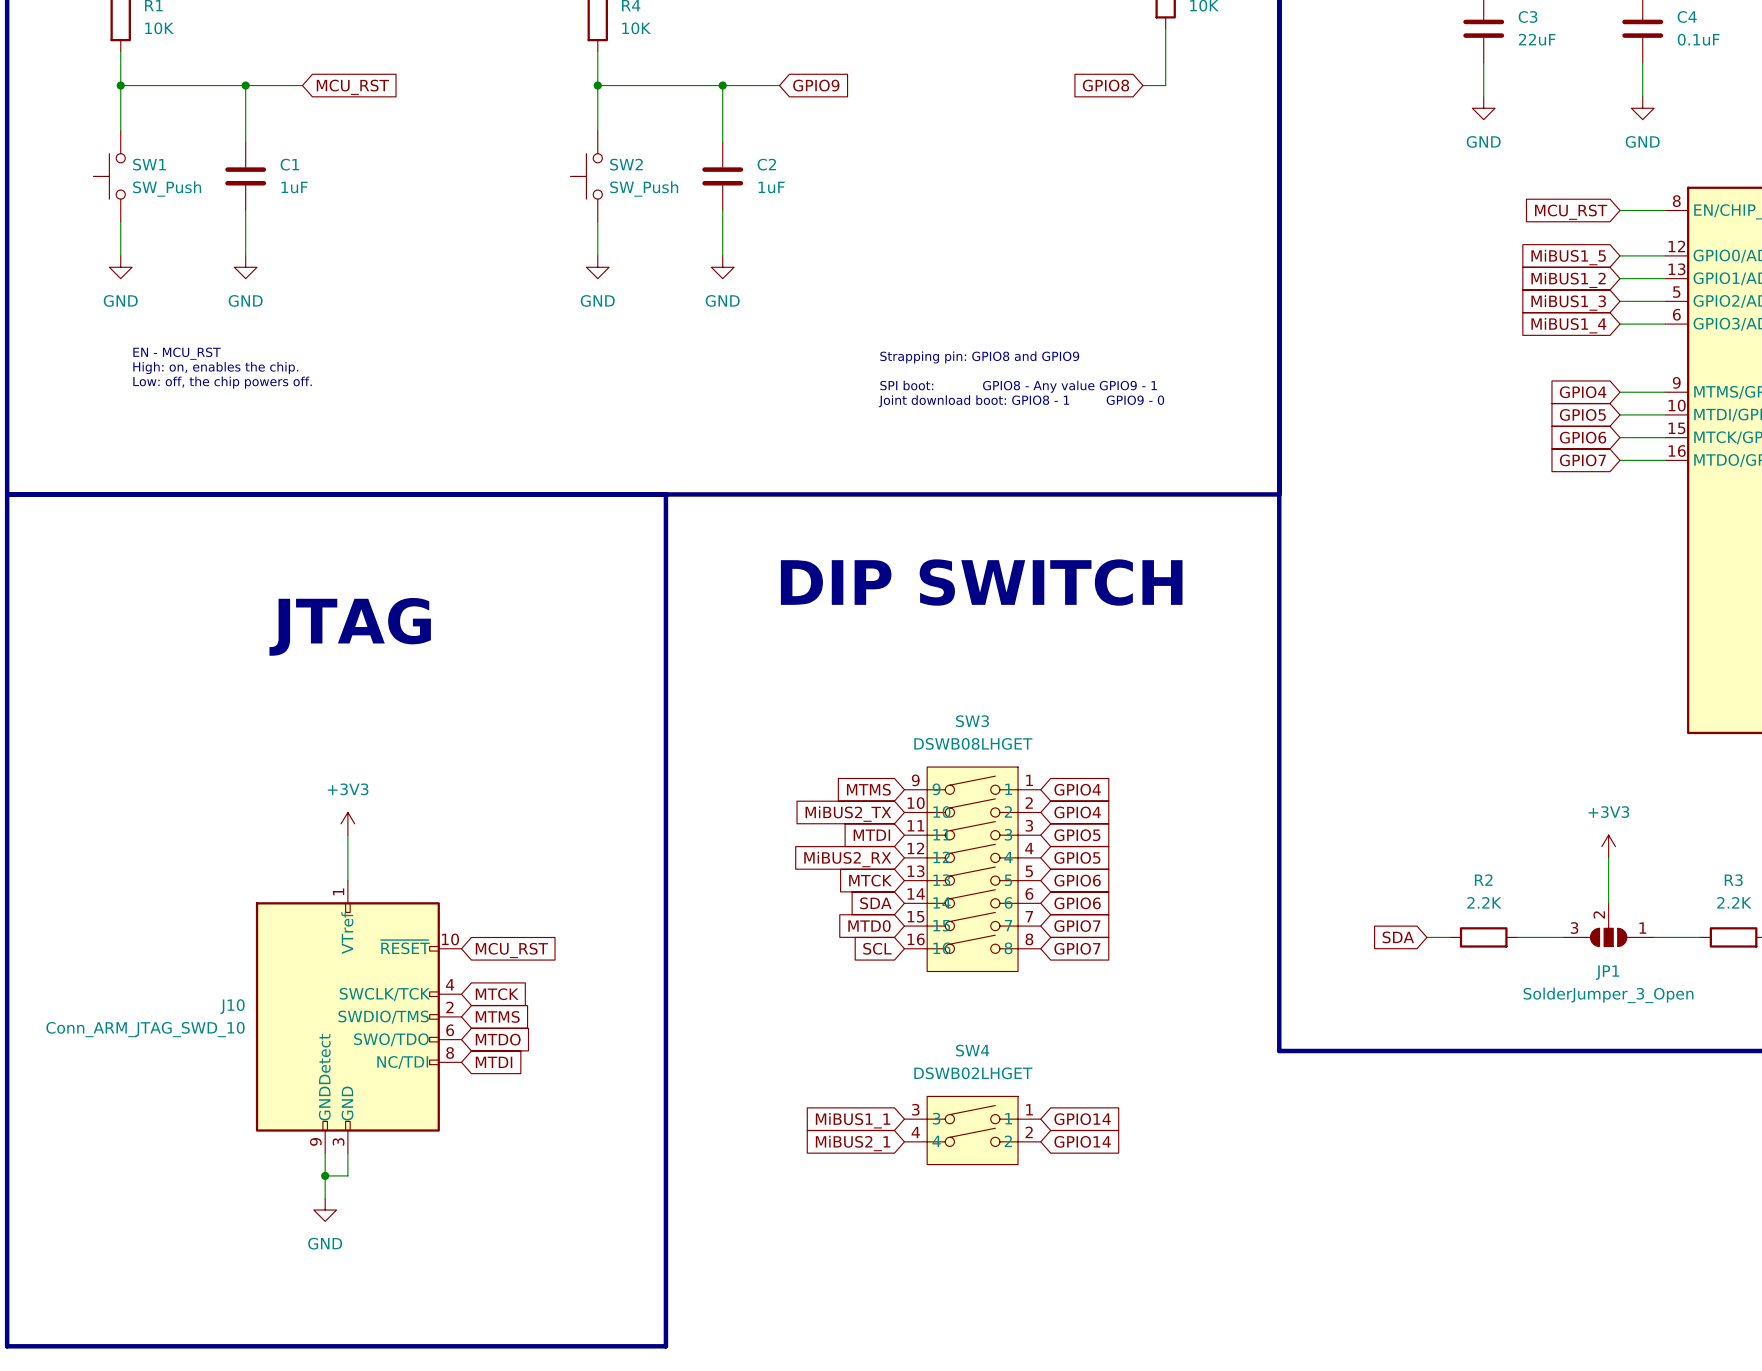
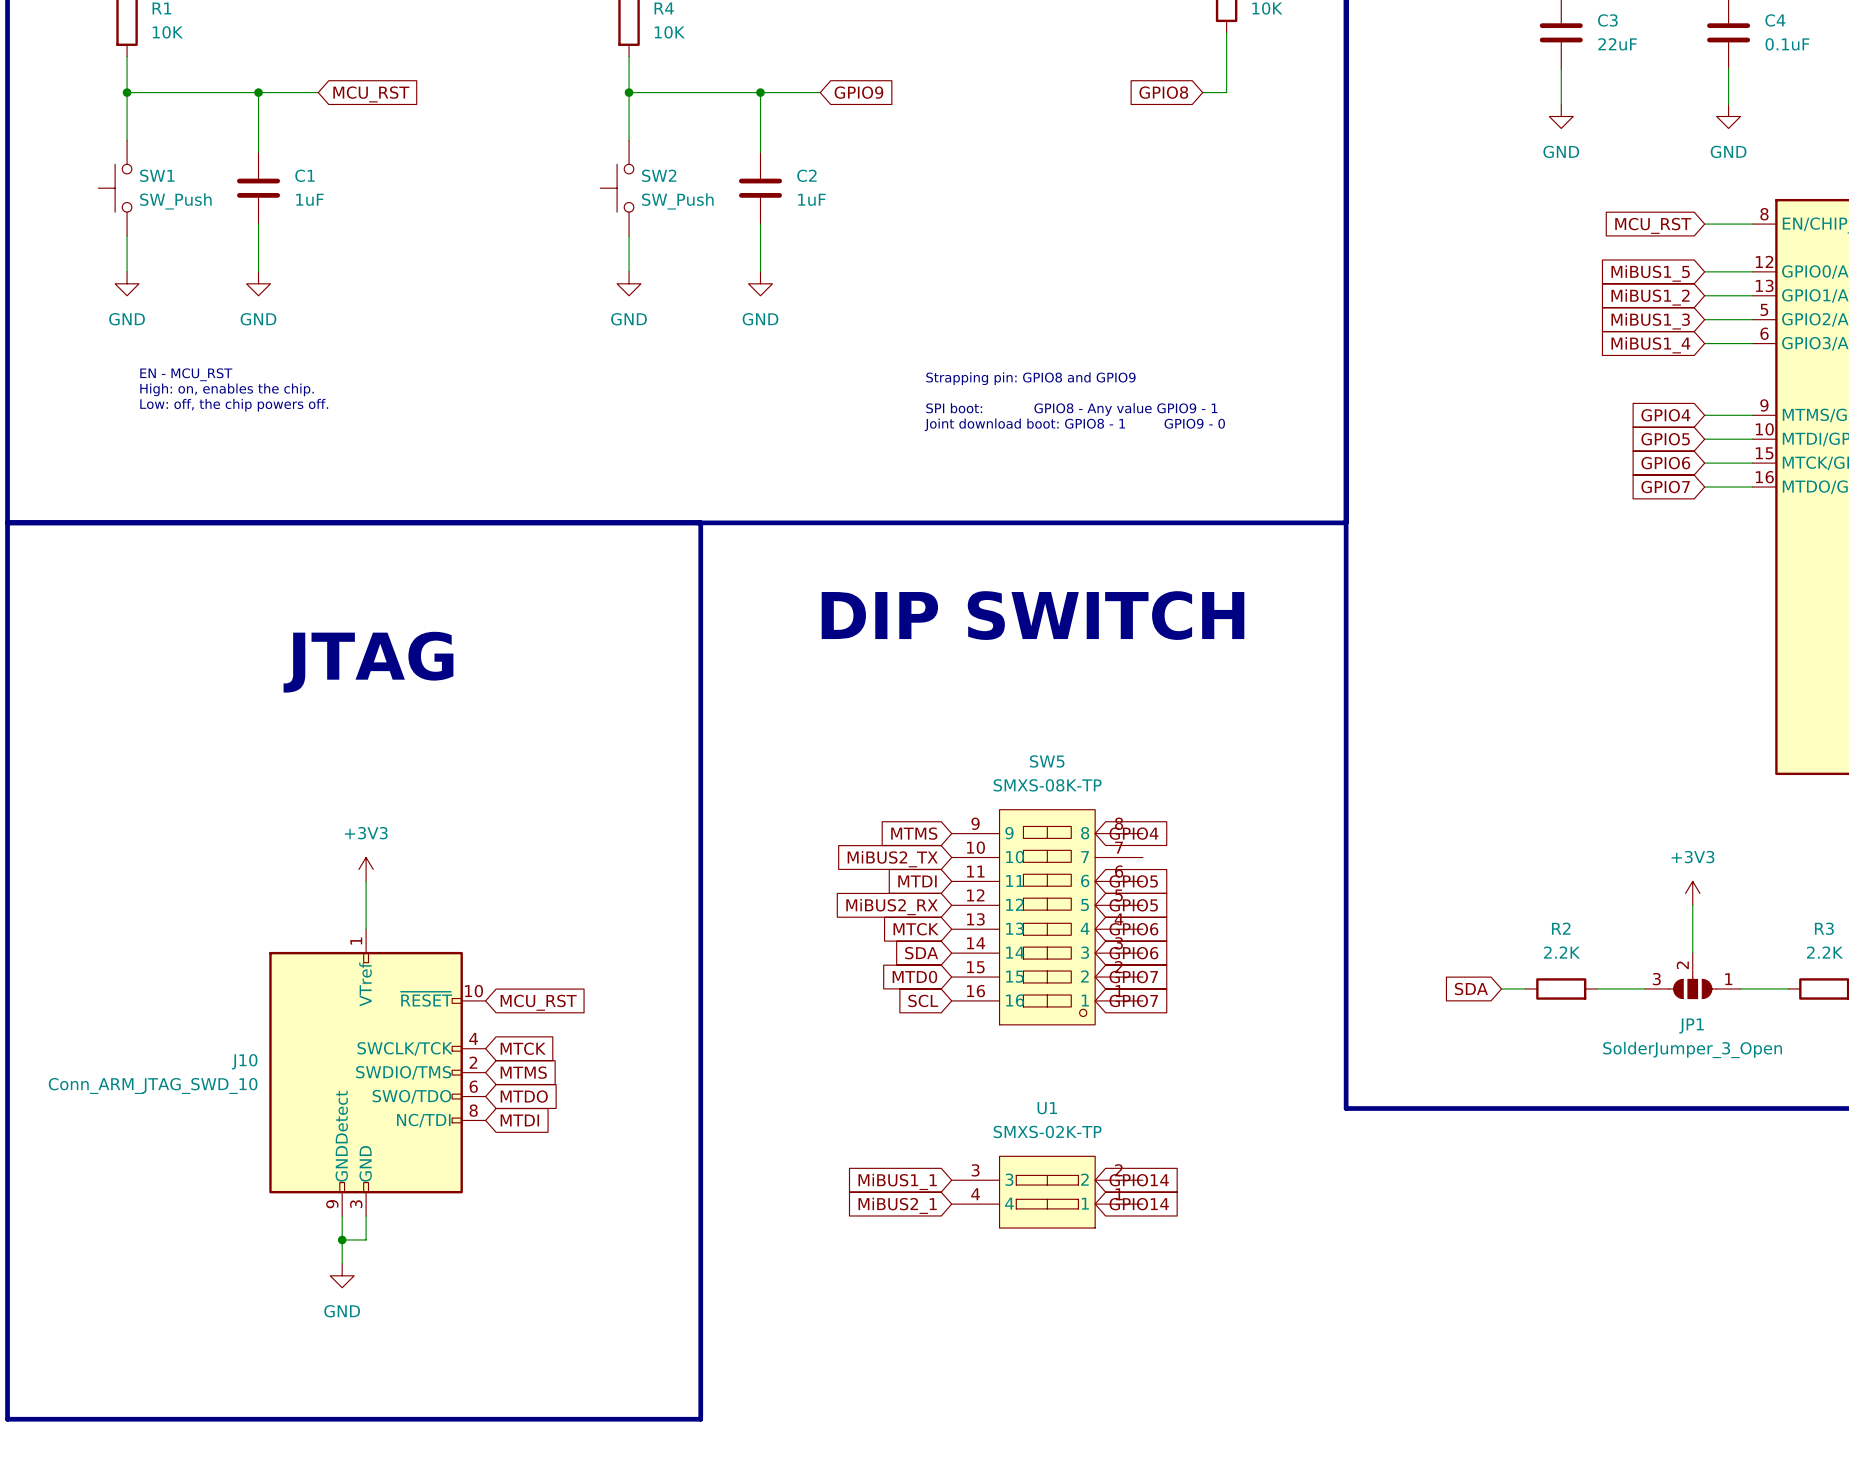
global label: GPIO4 (1077, 812) -> none
SW3: DSWB08LHGET (972, 869) -> none
SW5: none -> SMXS-08K-TP (1047, 917)
SW4: DSWB02LHGET (972, 1130) -> none
U1: none -> SMXS-02K-TP (1047, 1192)

